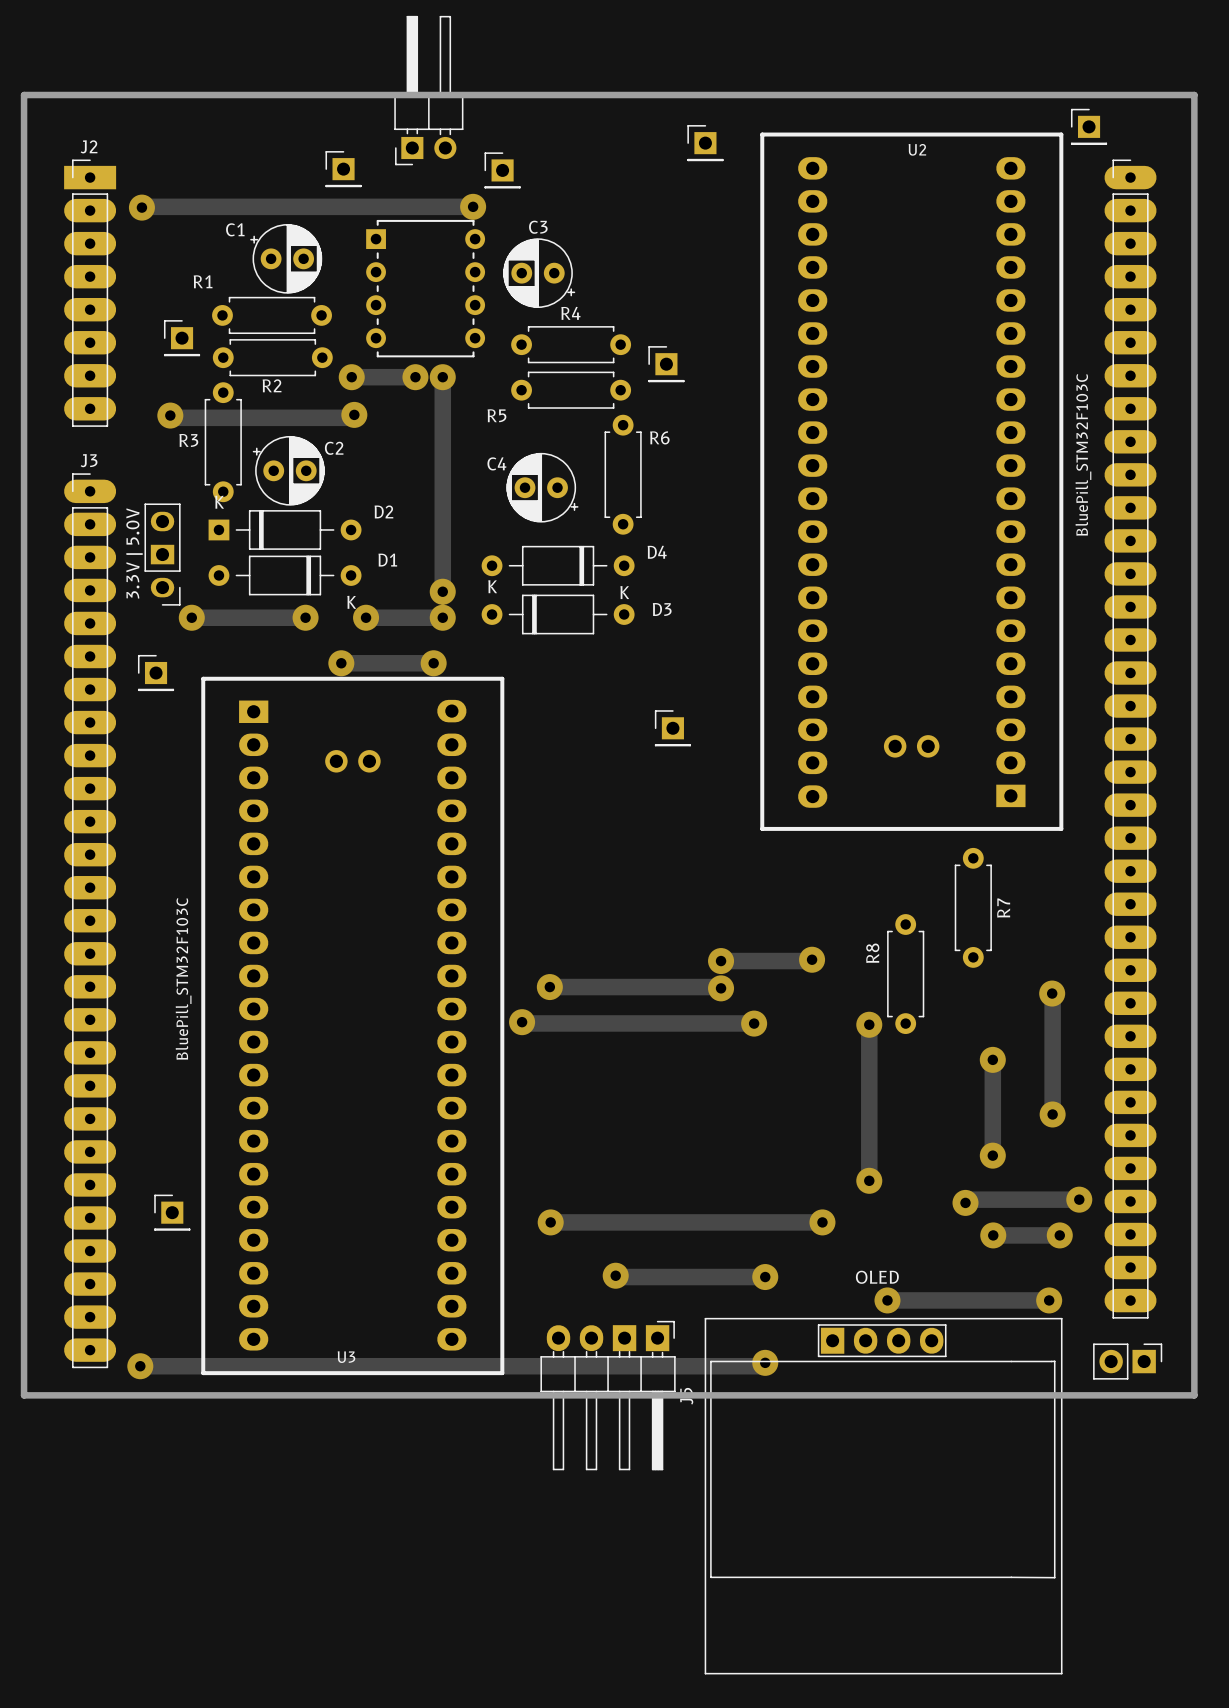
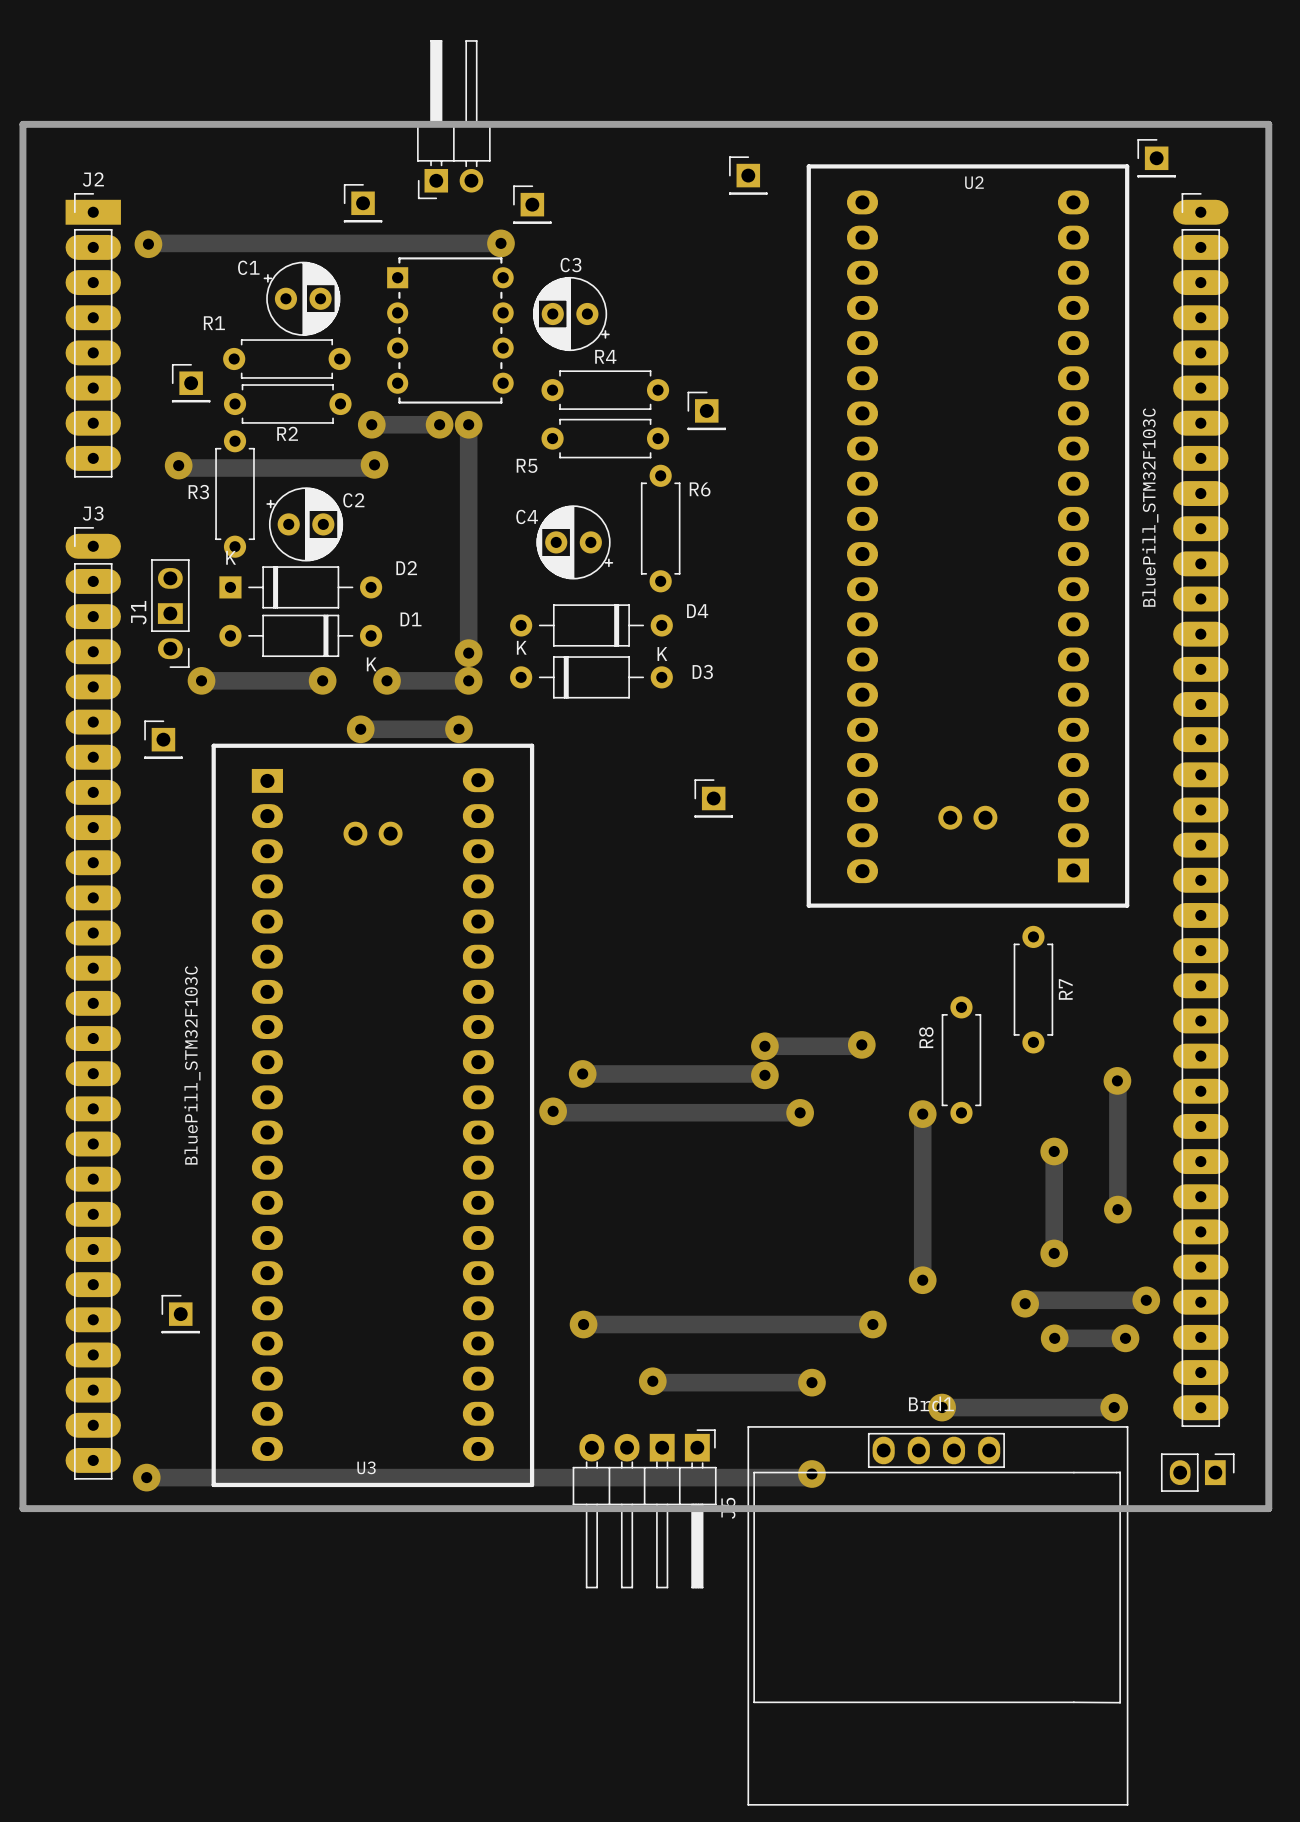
3.3V | 5.0V name: 3.3V | 5.0V (134, 553) -> J1 (138, 612)
part footprint: [1093, 1343, 1163, 1380] -> [1160, 1453, 1235, 1492]
OLED: (883, 1496) -> none
Brd1: none -> (937, 1615)

